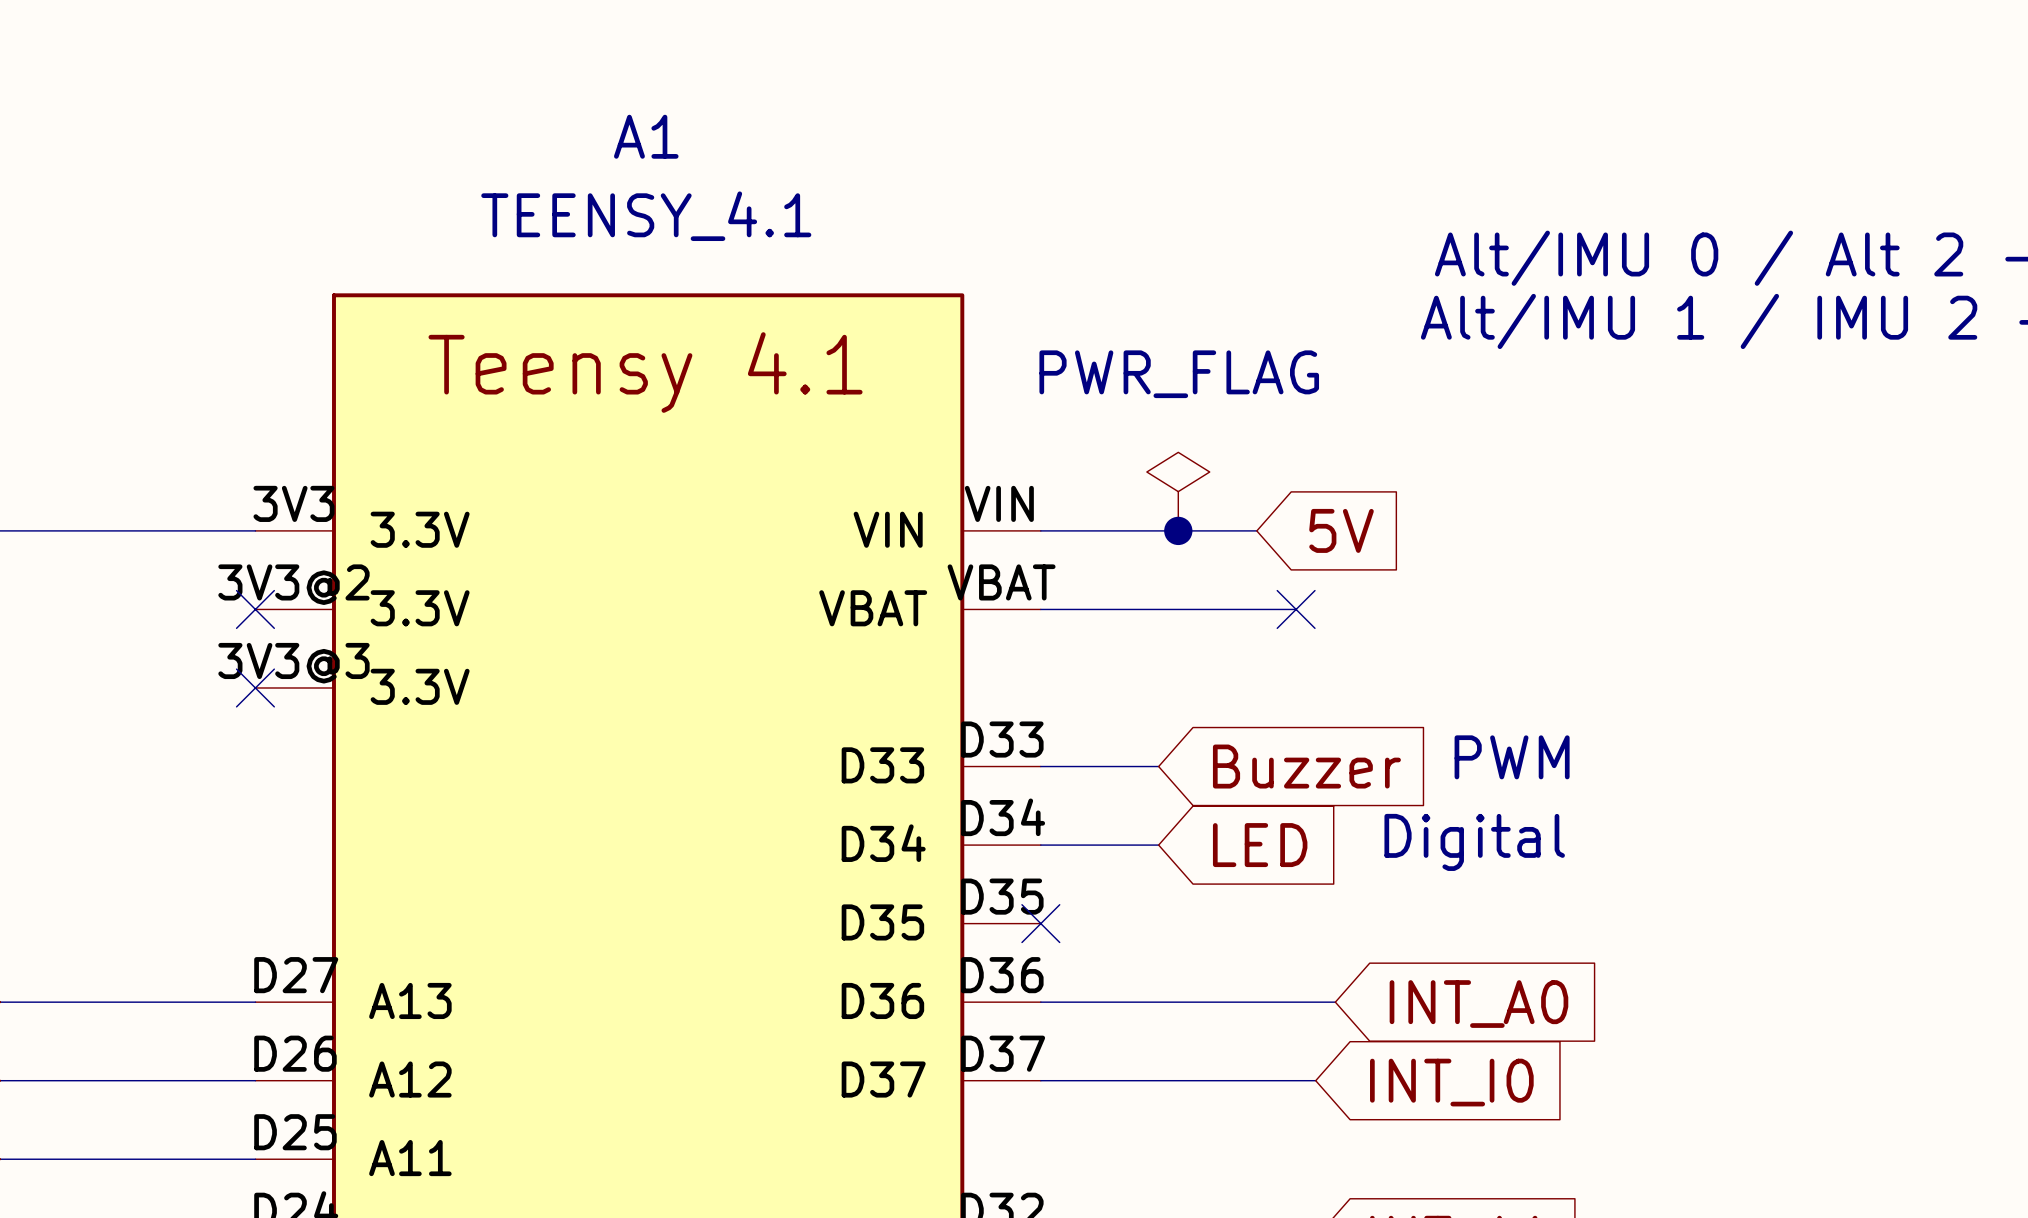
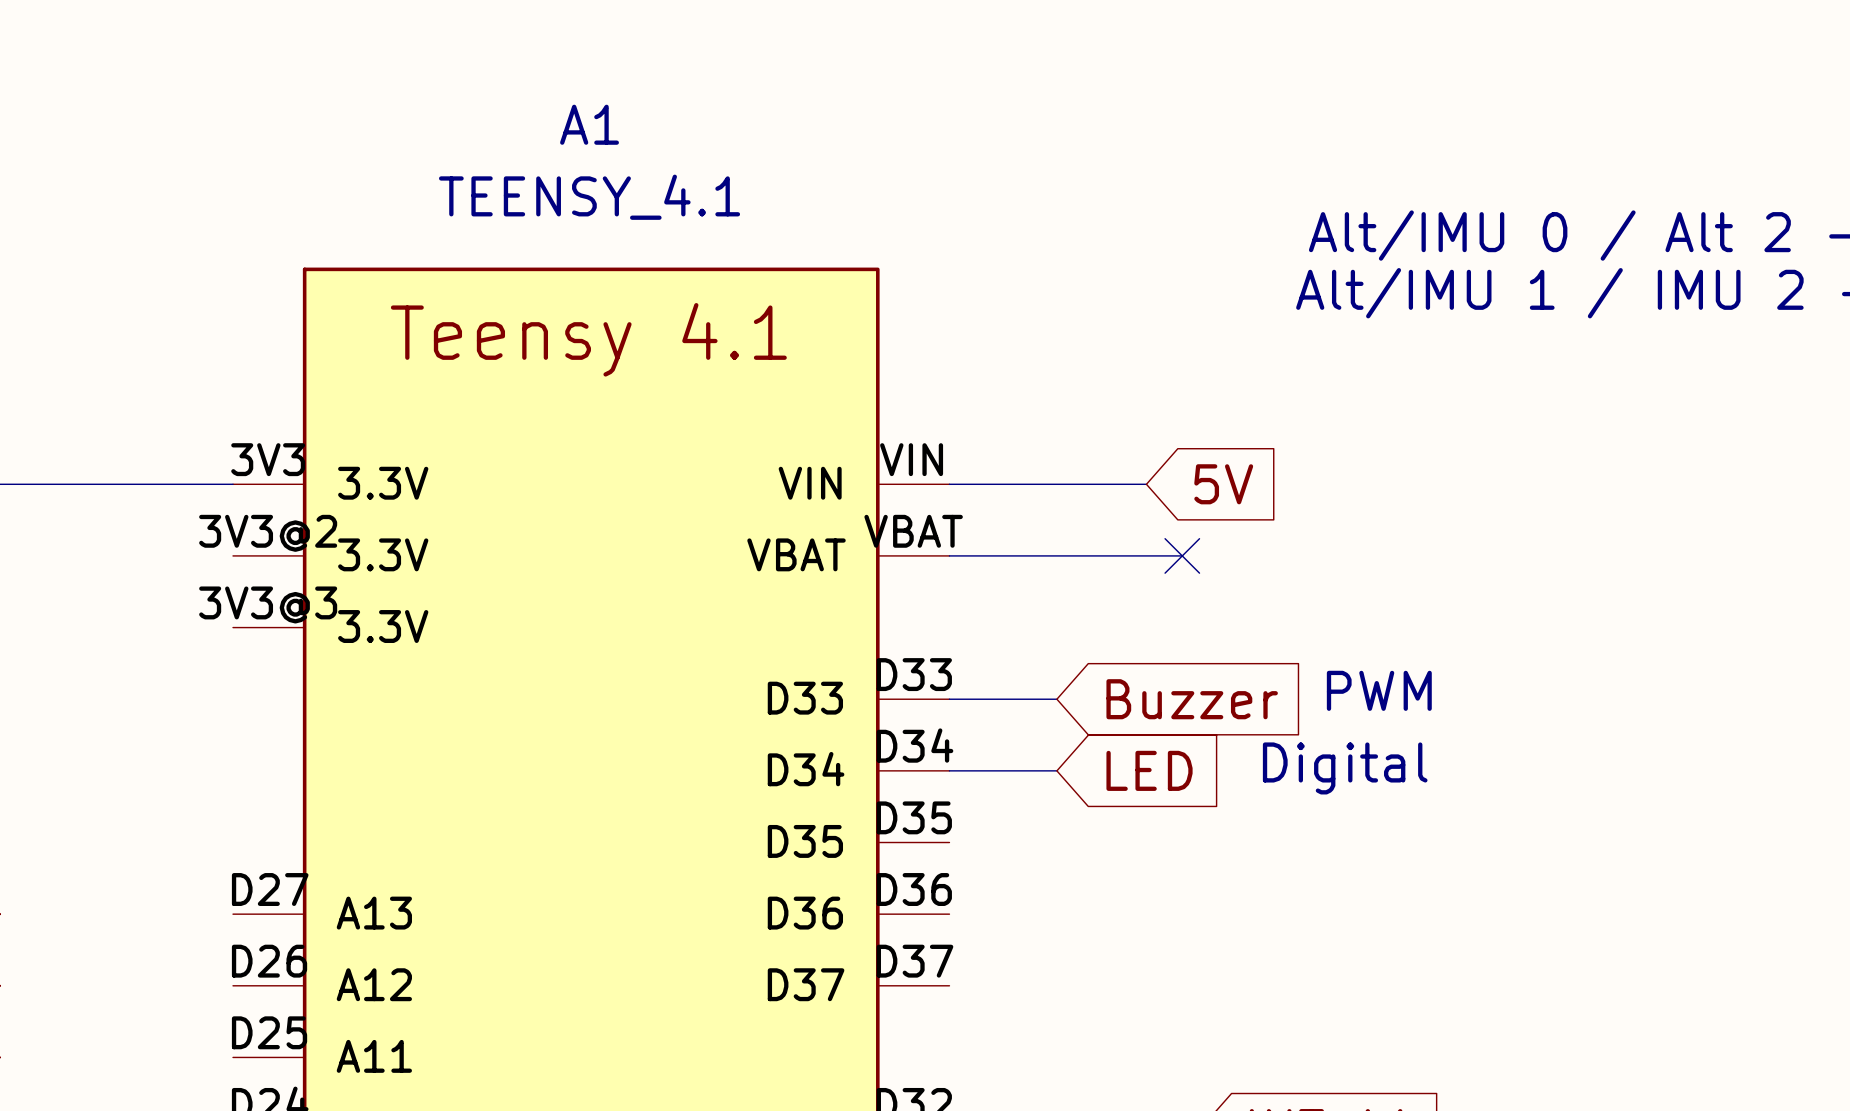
power symbol: PWR_FLAG (1178, 491) -> none
junction: (1178, 530) -> none
no-connect mark: (255, 609) -> none
no-connect mark: (255, 687) -> none
no-connect mark: (1040, 923) -> none
wire: (0, 1002) (255, 1002) -> none
wire: (1040, 1002) (1335, 1002) -> none
global label: INT_A0 (1478, 1004) -> none
wire: (0, 1080) (255, 1080) -> none
wire: (1040, 1080) (1315, 1080) -> none
global label: INT_I0 (1451, 1082) -> none
wire: (0, 1159) (255, 1159) -> none

